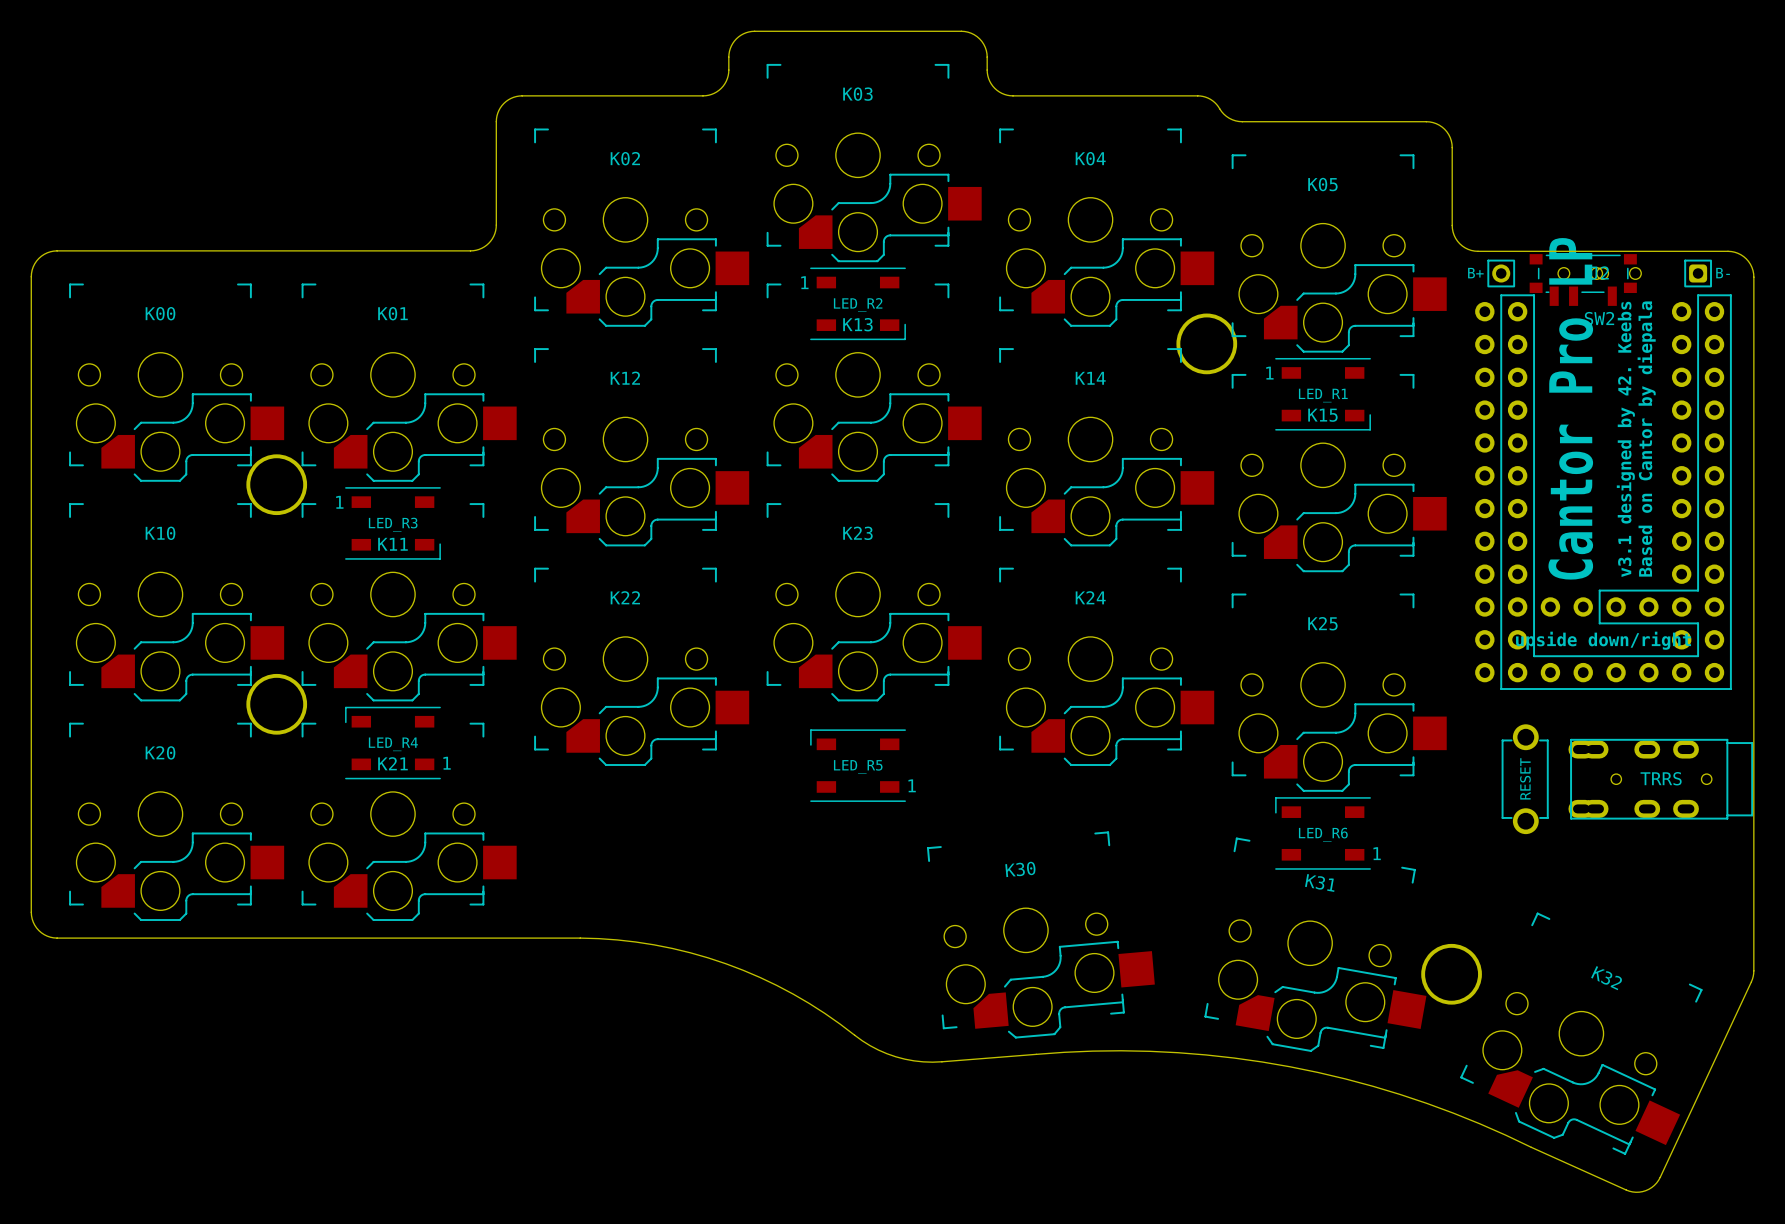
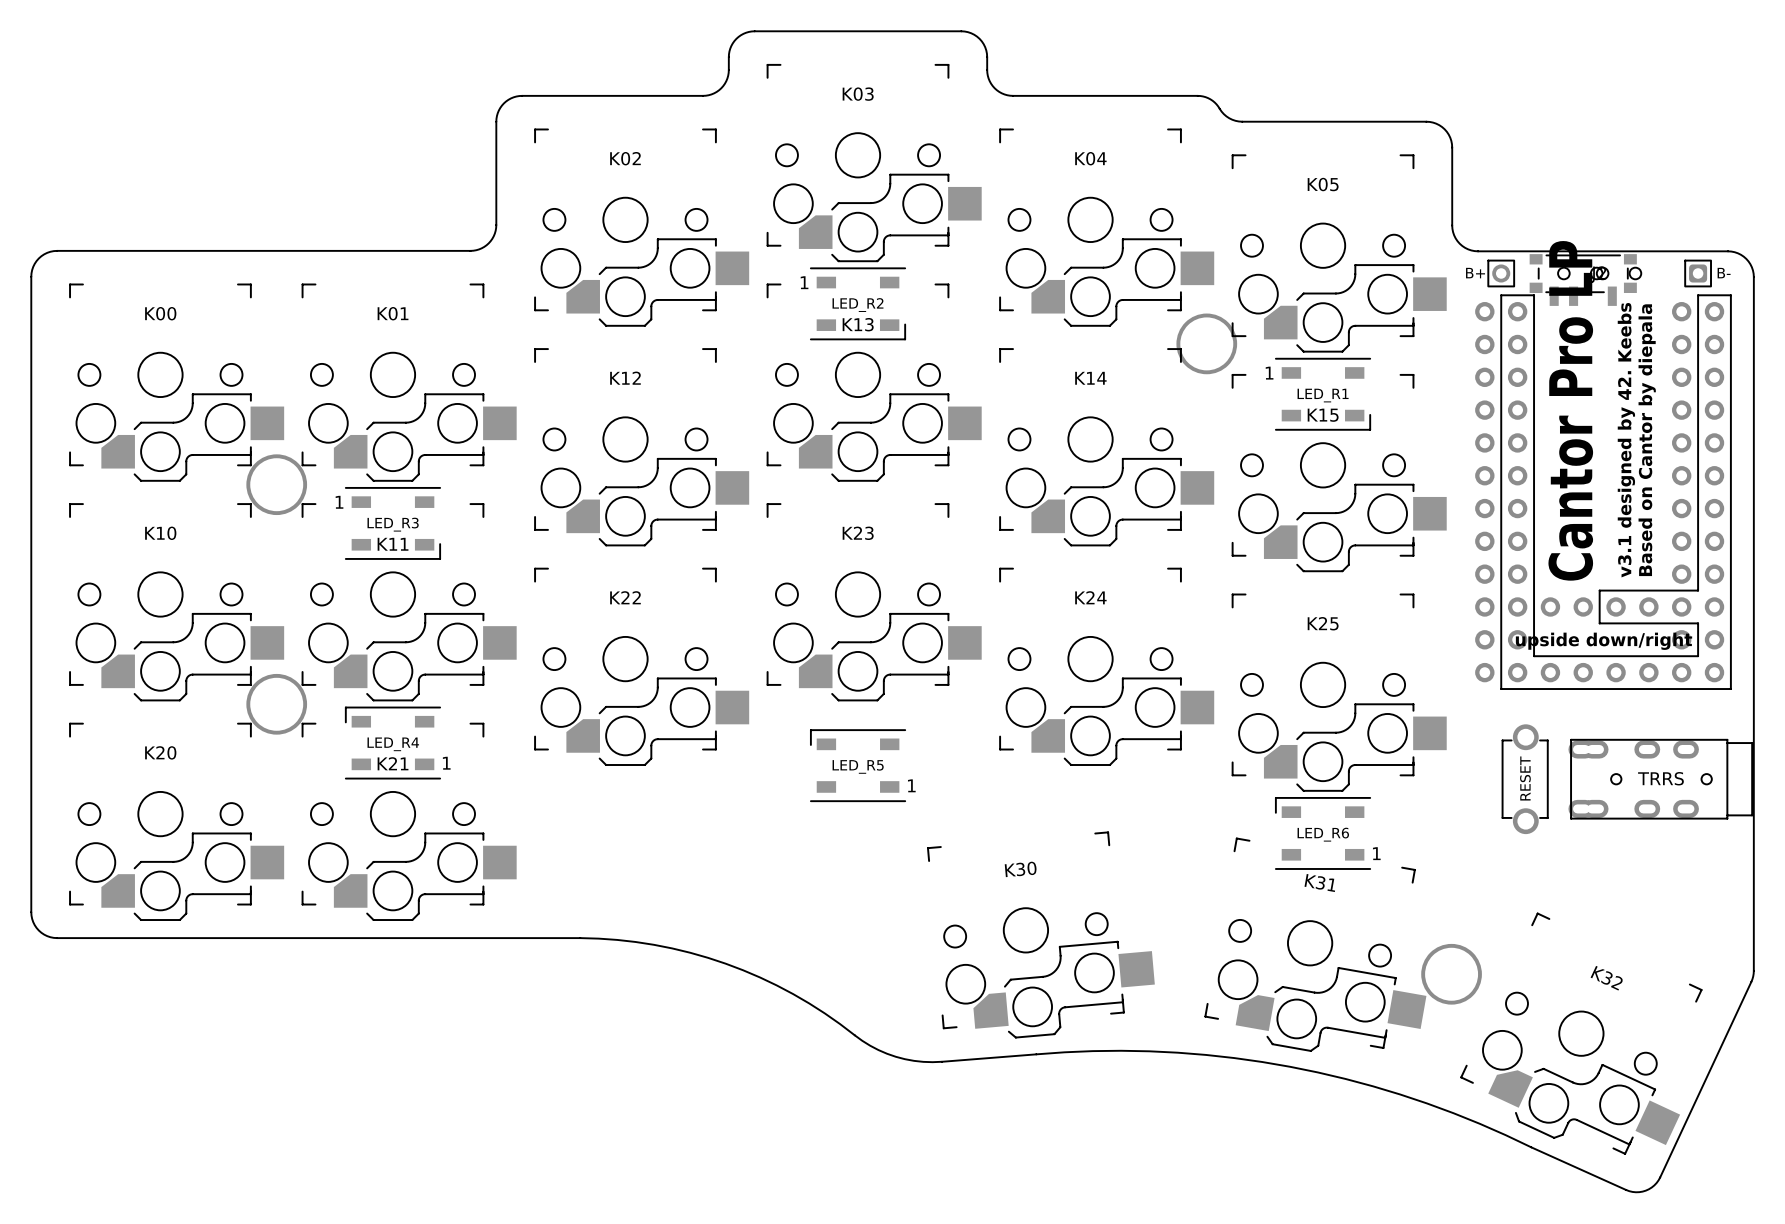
SW2 name: SW2 (1599, 318) -> none

